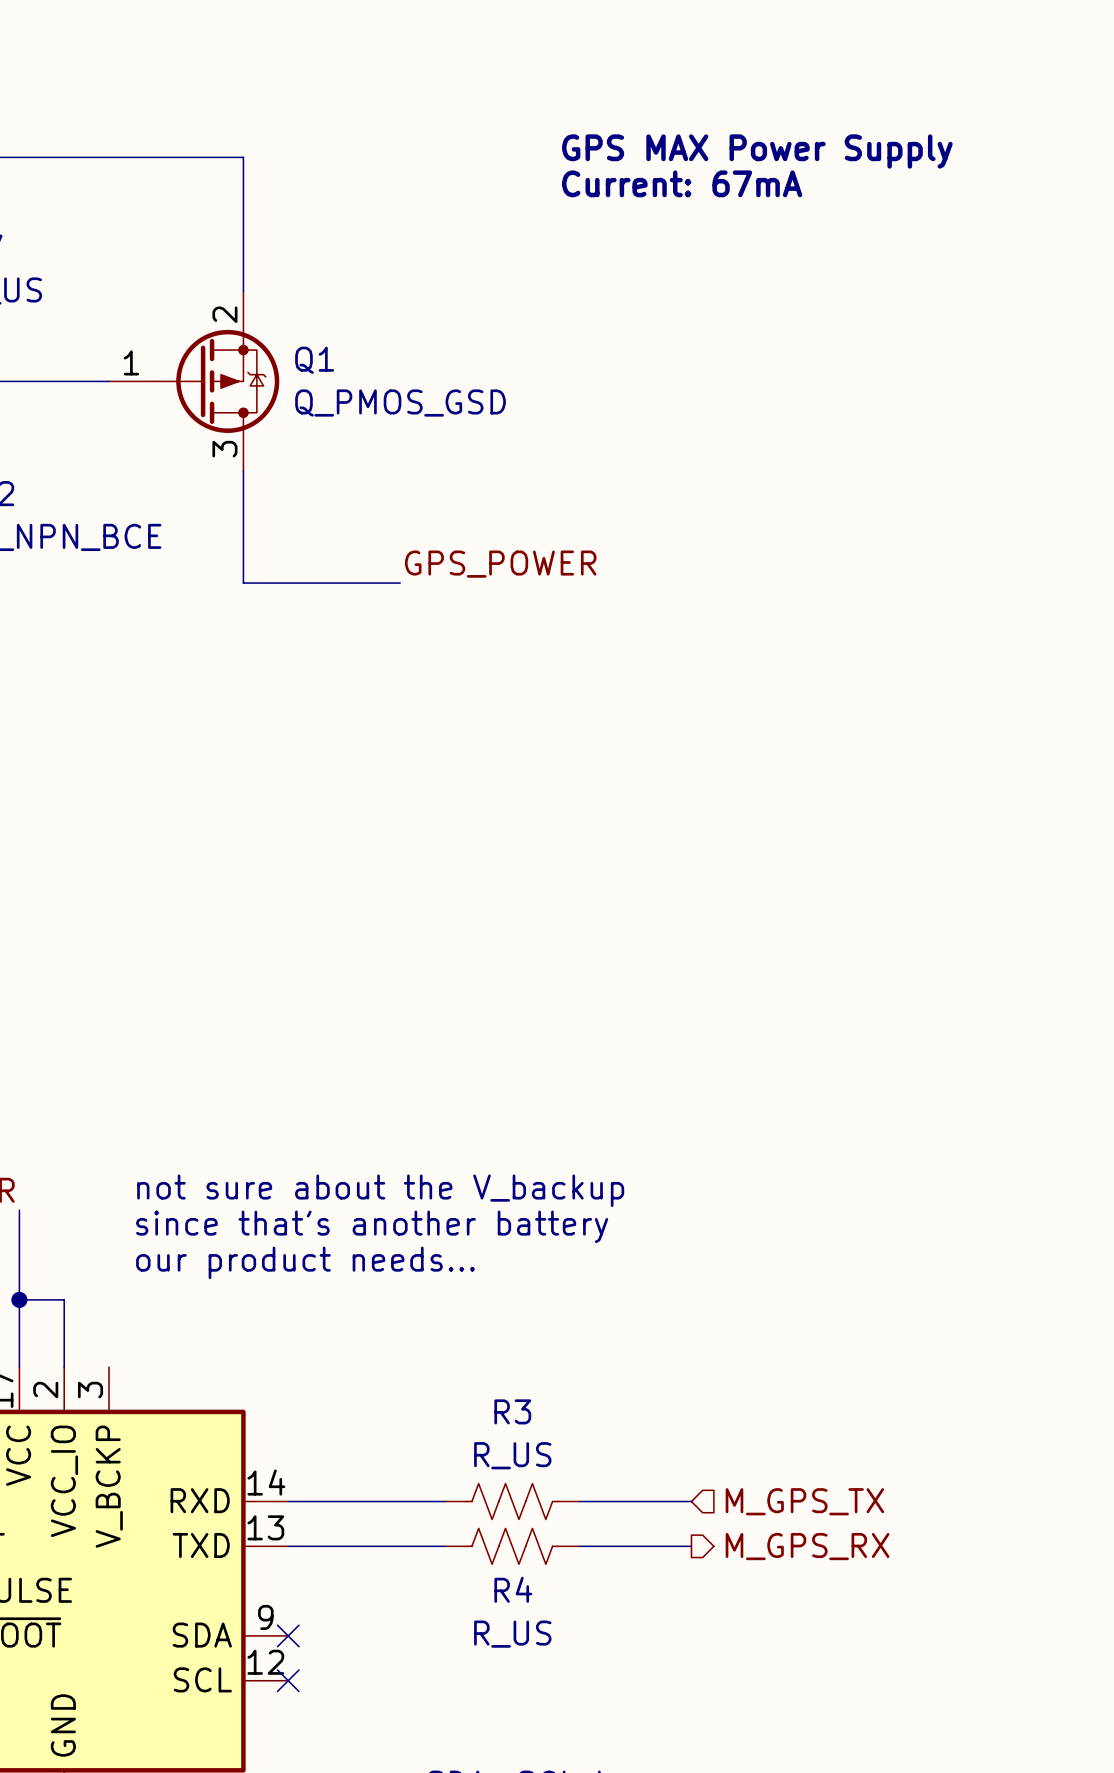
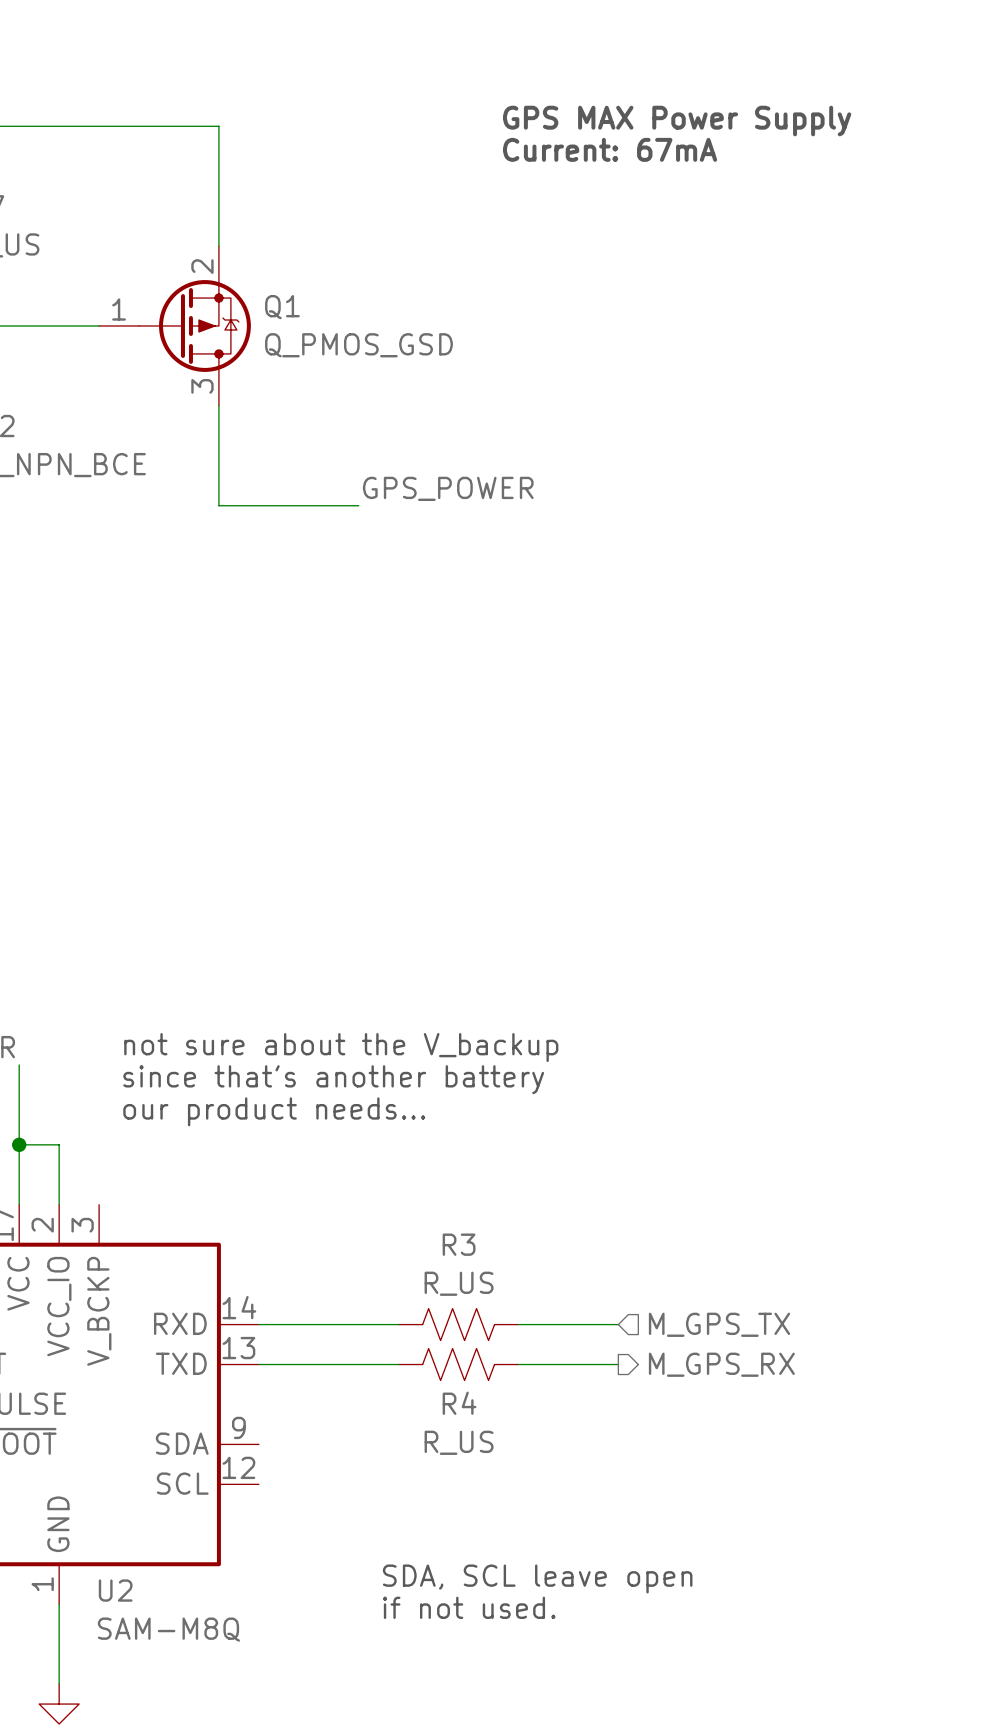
no-connect mark: (288, 1635) -> none
no-connect mark: (288, 1680) -> none

